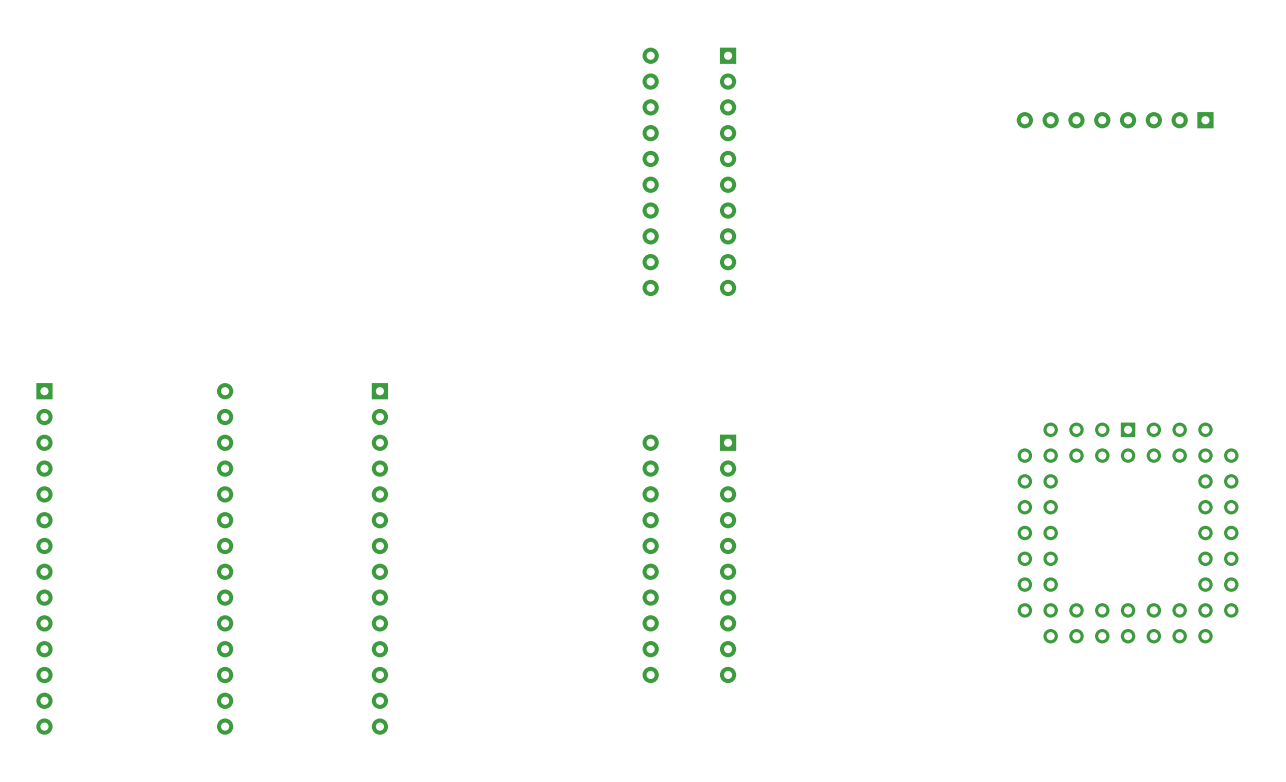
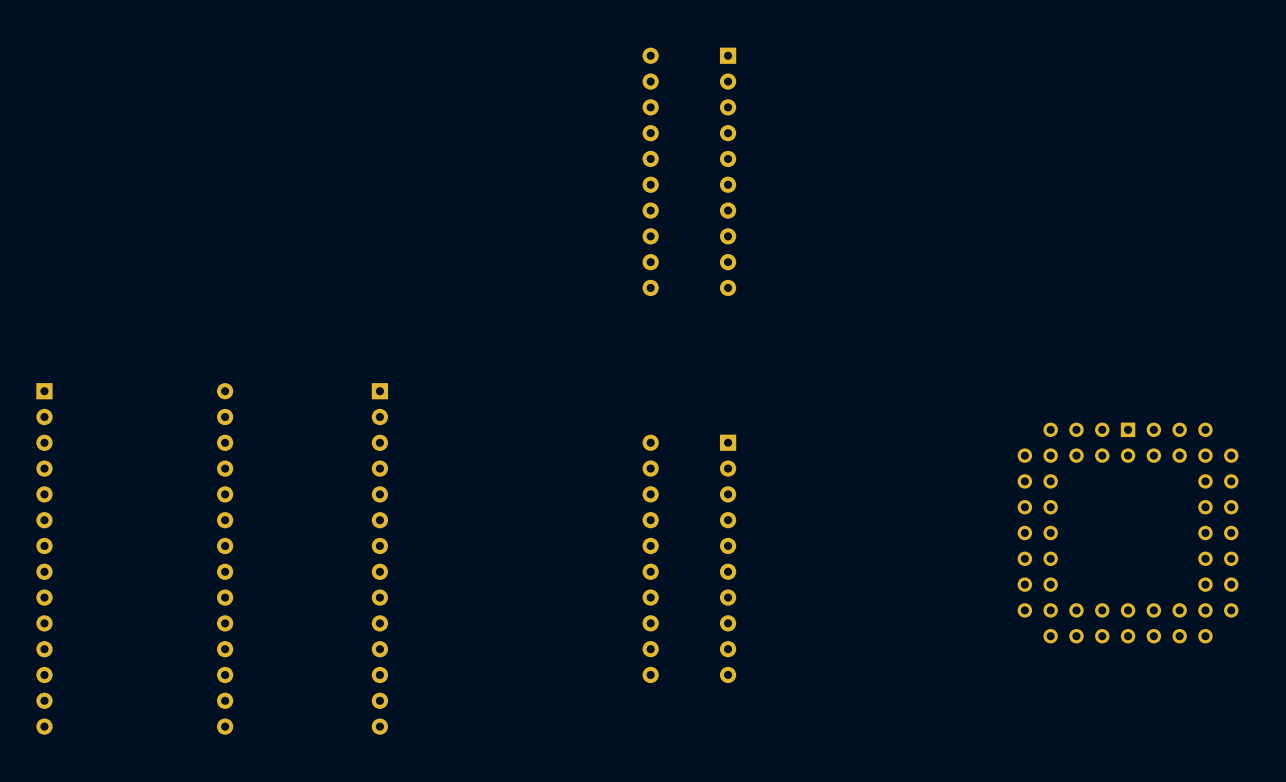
part: (1115, 120) -> none

